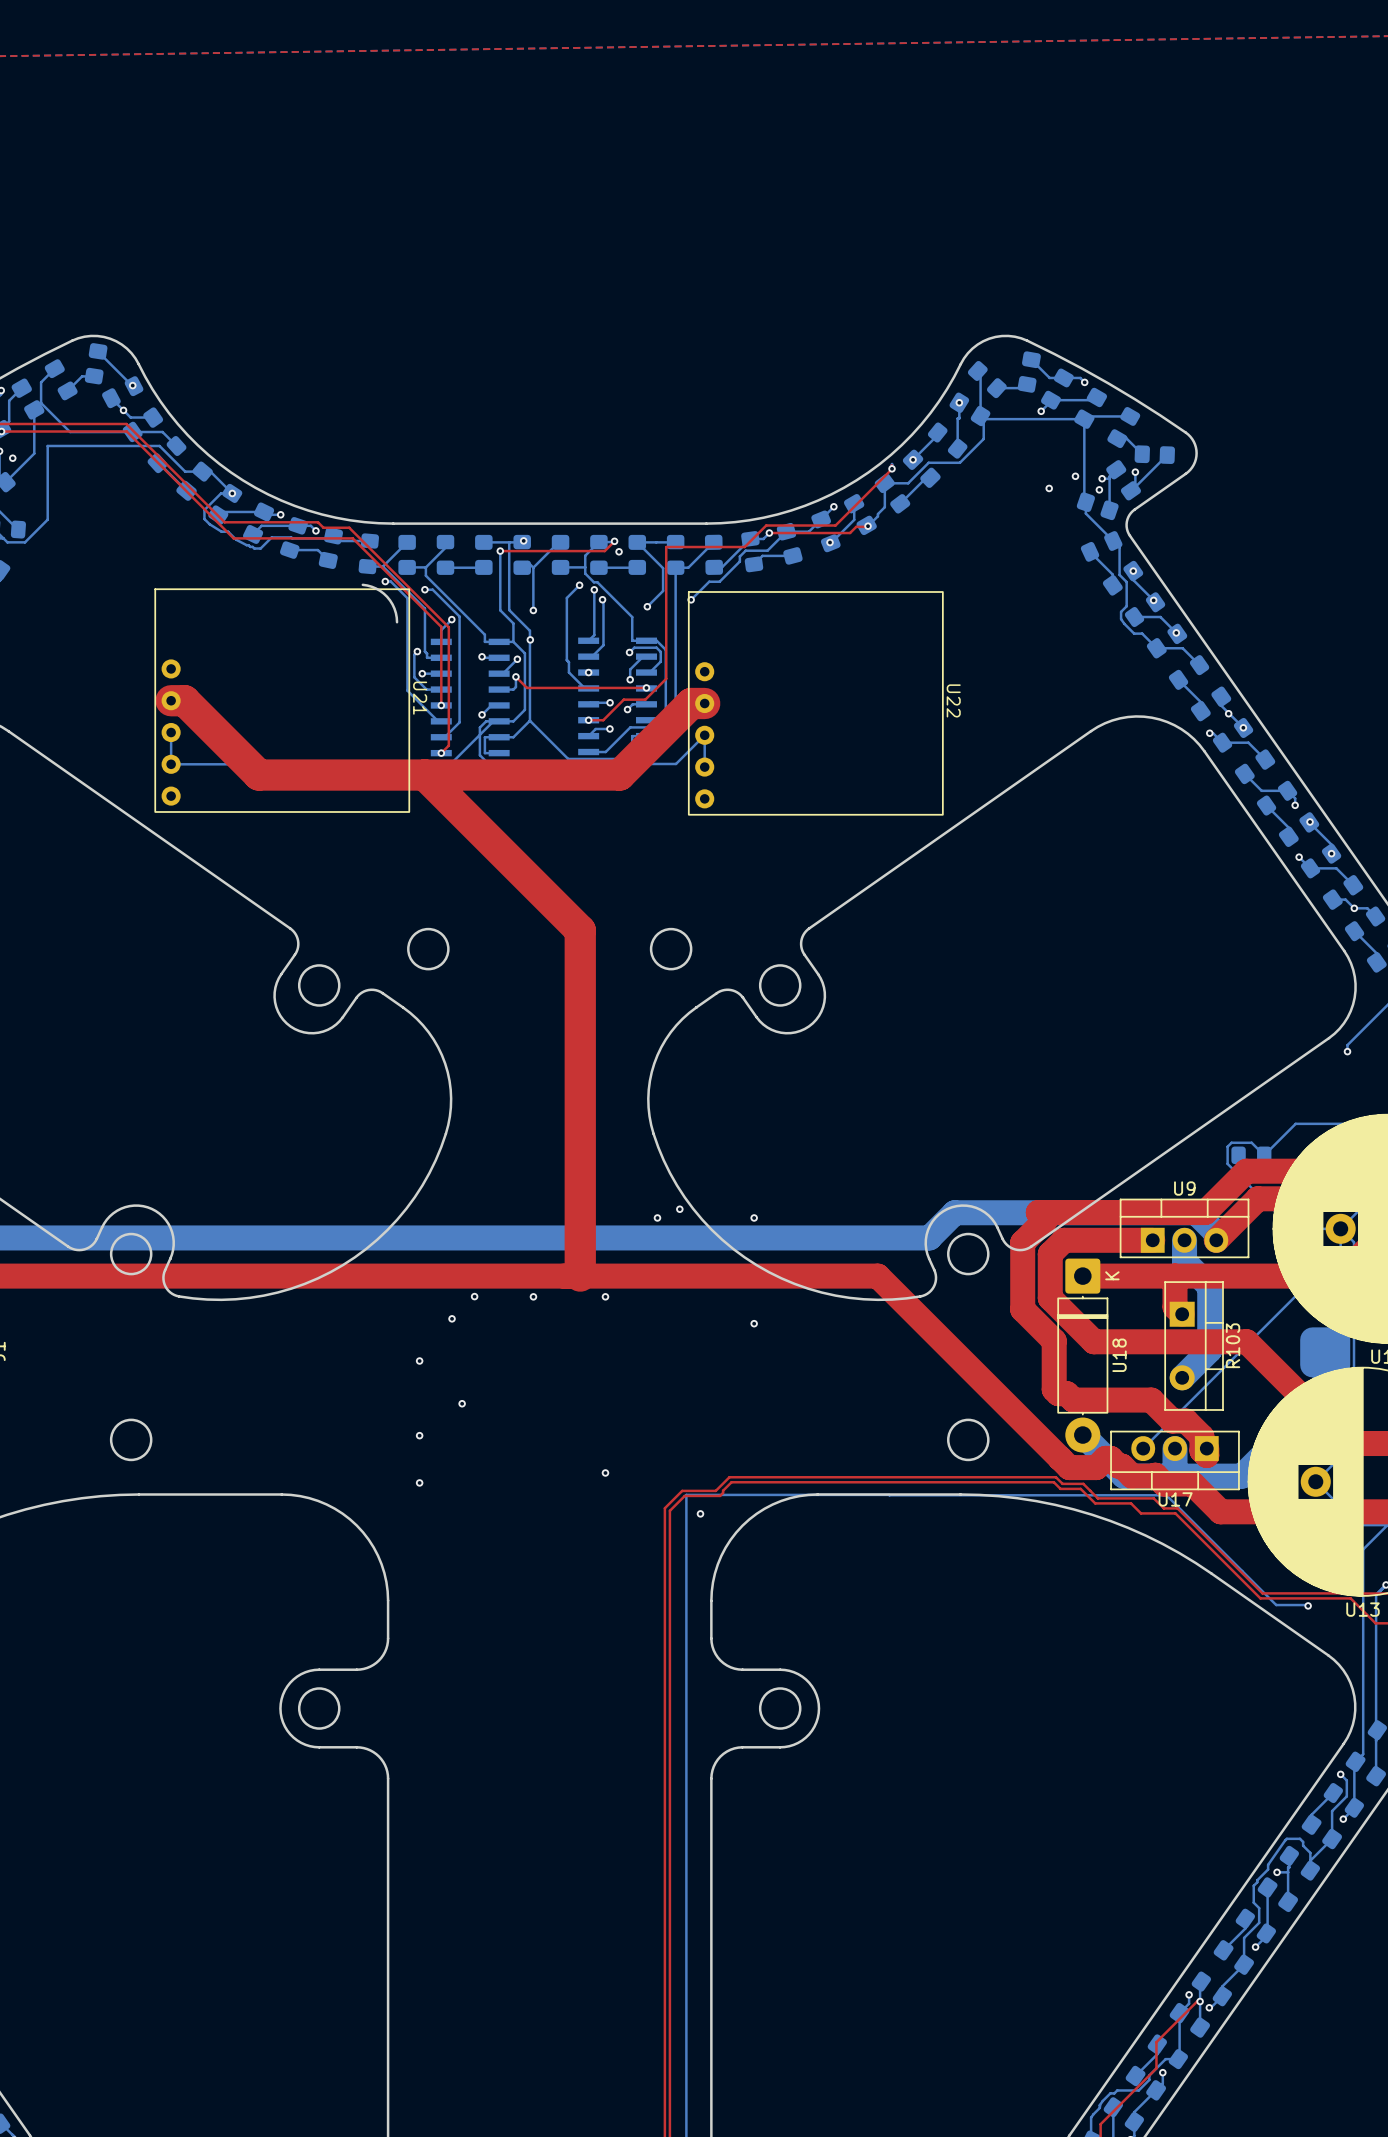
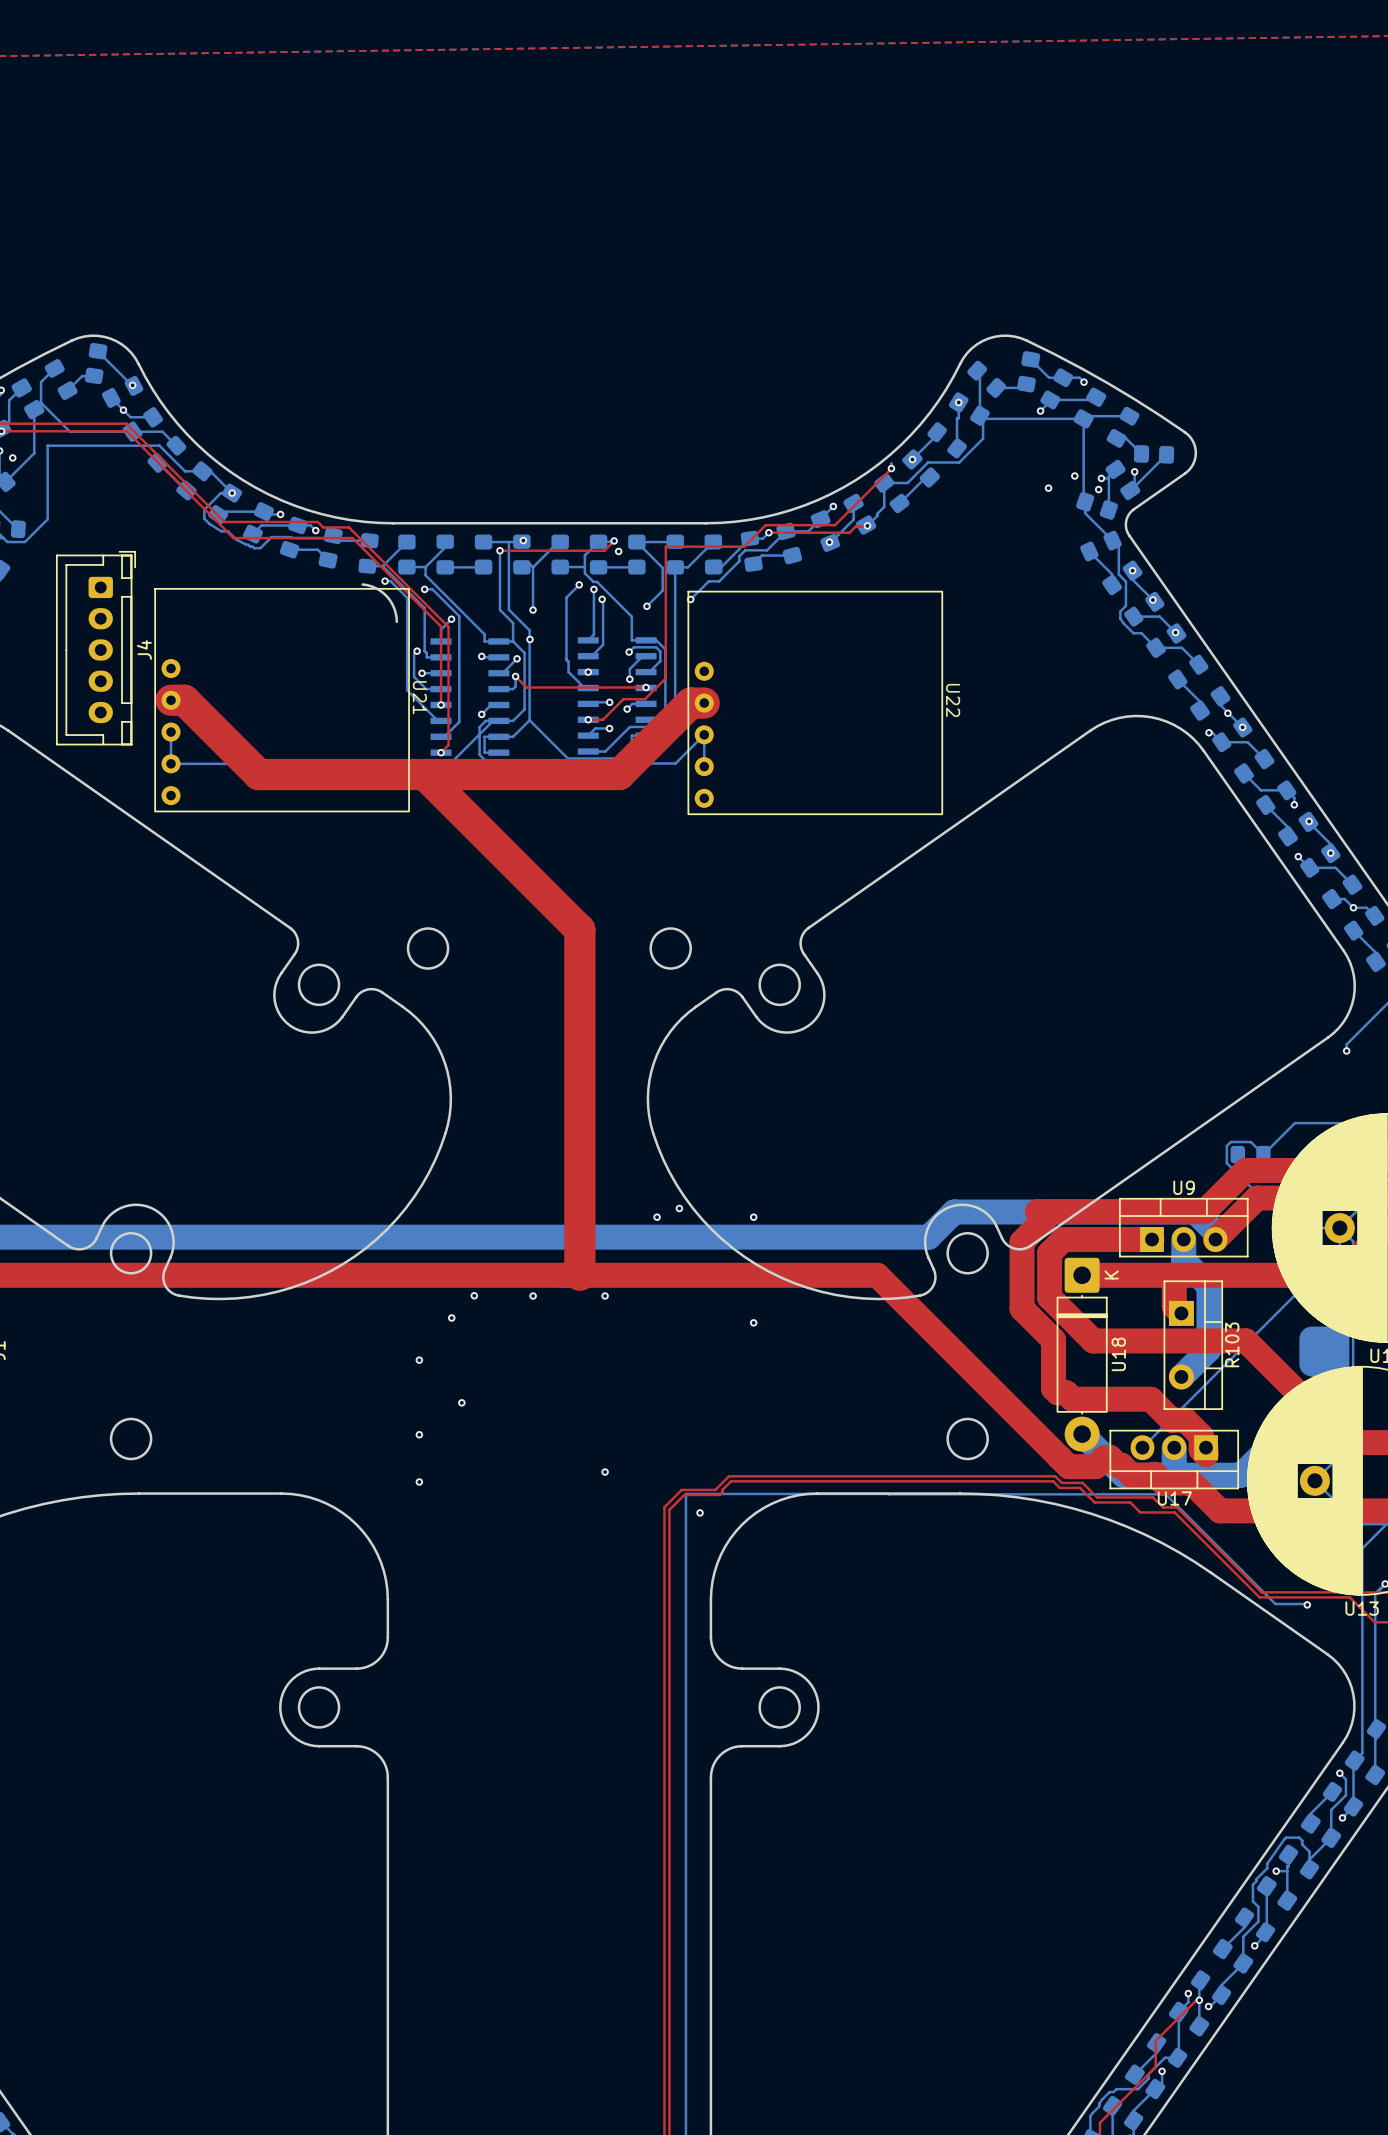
J4: none -> (95, 648)

